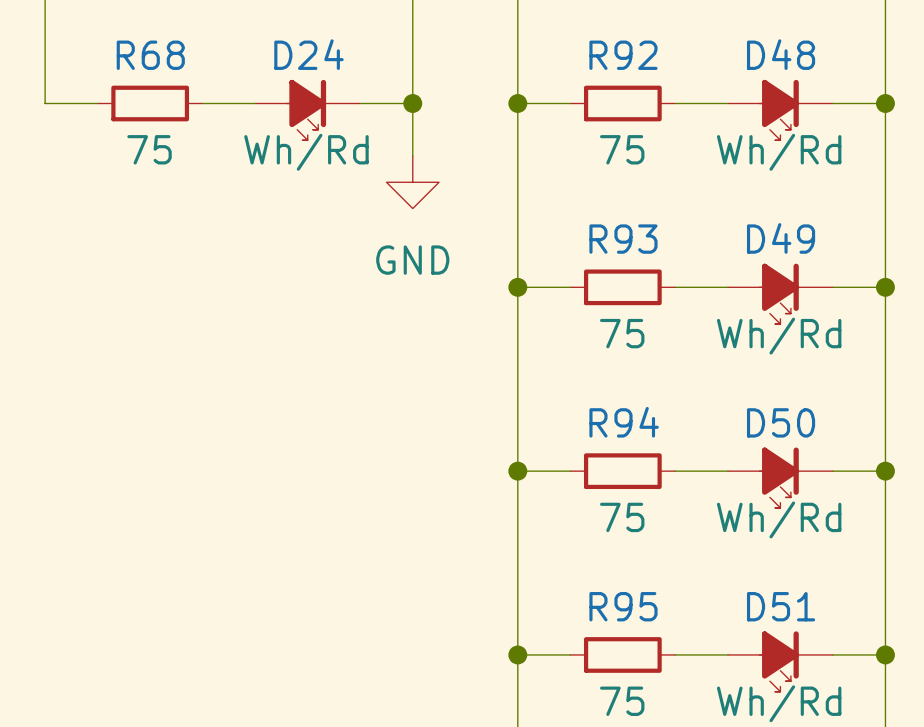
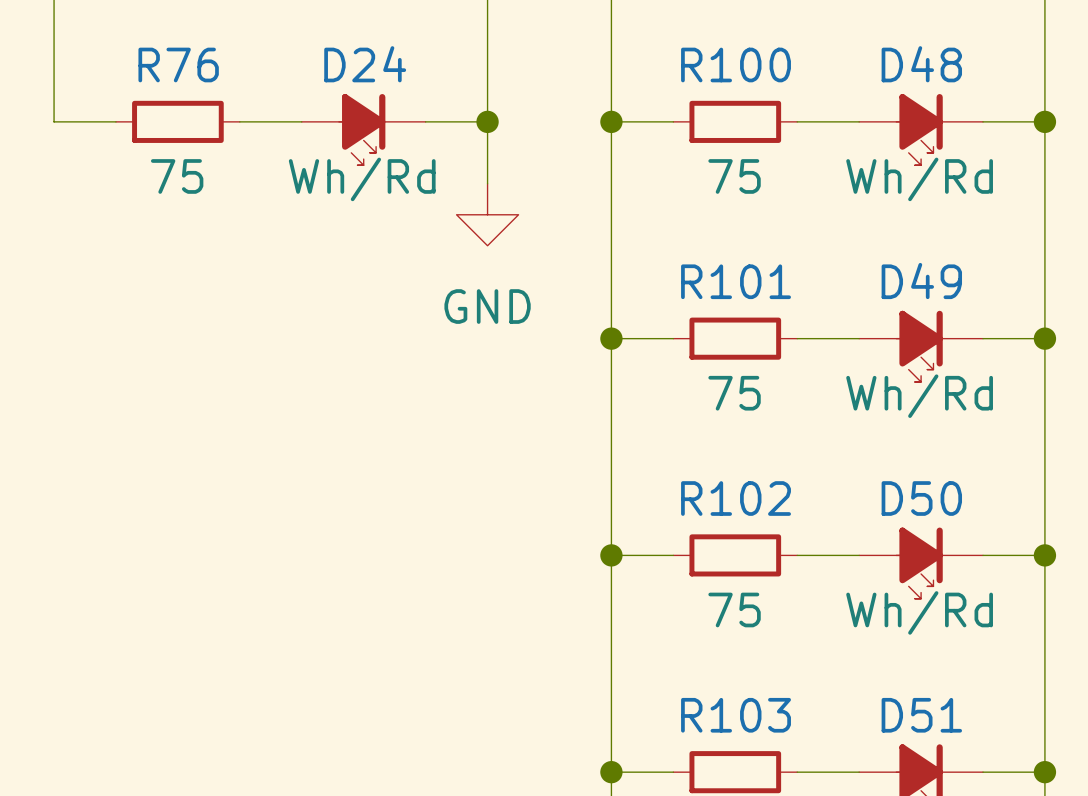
R68 name: R68 (150, 55) -> R76 (178, 64)
R92 name: R92 (623, 55) -> R100 (736, 64)
R93 name: R93 (623, 239) -> R101 (736, 281)
R94 name: R94 (624, 422) -> R102 (736, 498)
R95 name: R95 (623, 606) -> R103 (736, 715)

